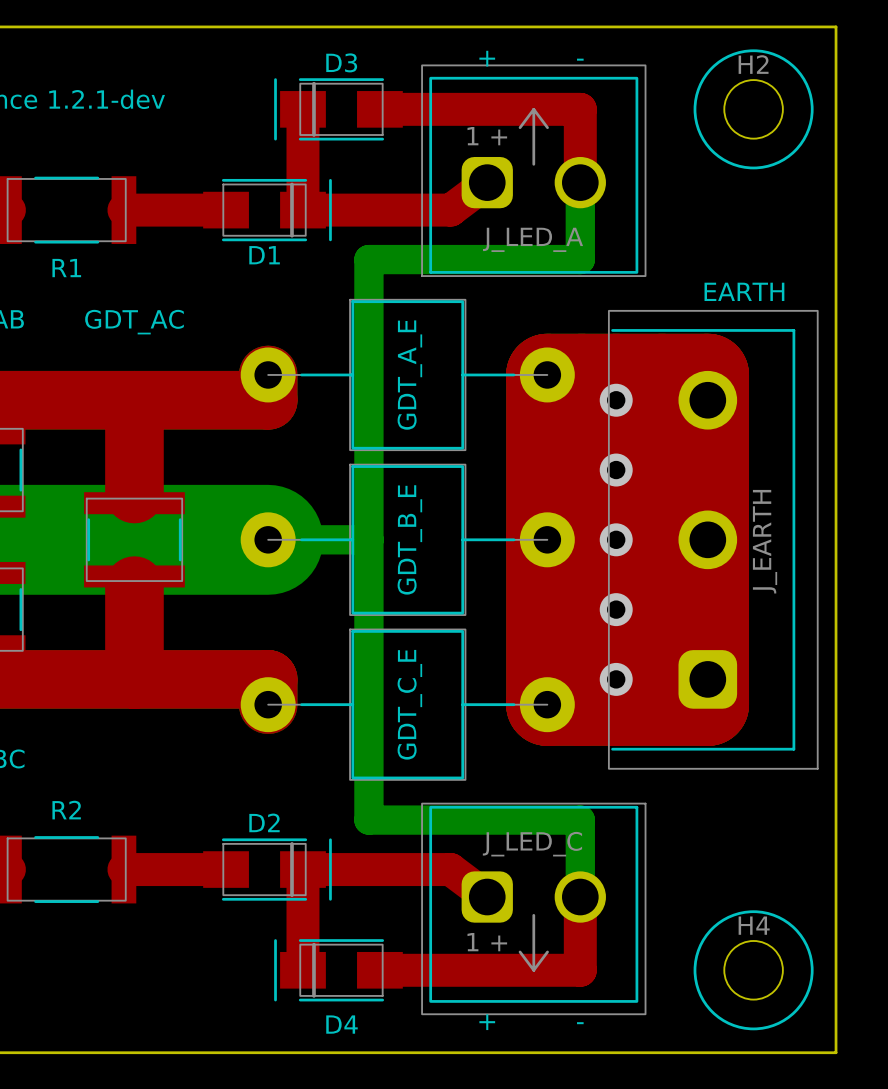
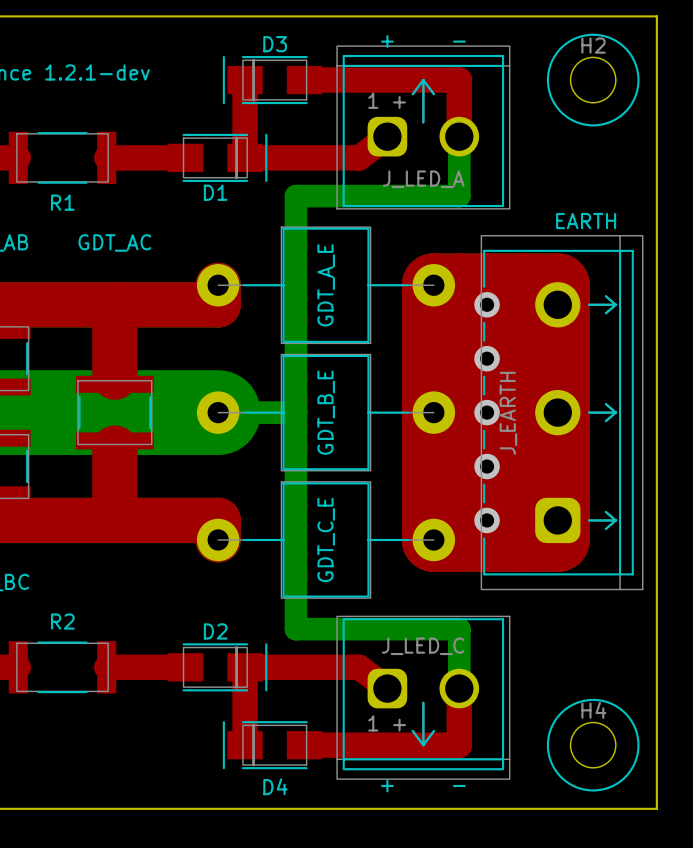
J_LED_A footprint: [421, 64, 647, 277] -> [336, 45, 511, 210]
J_EARTH footprint: [607, 309, 819, 770] -> [480, 235, 644, 591]
J_EARTH name position: J_EARTH (765, 541) -> J_EARTH (508, 413)
J_LED_C footprint: [421, 802, 647, 1016] -> [336, 615, 511, 780]

